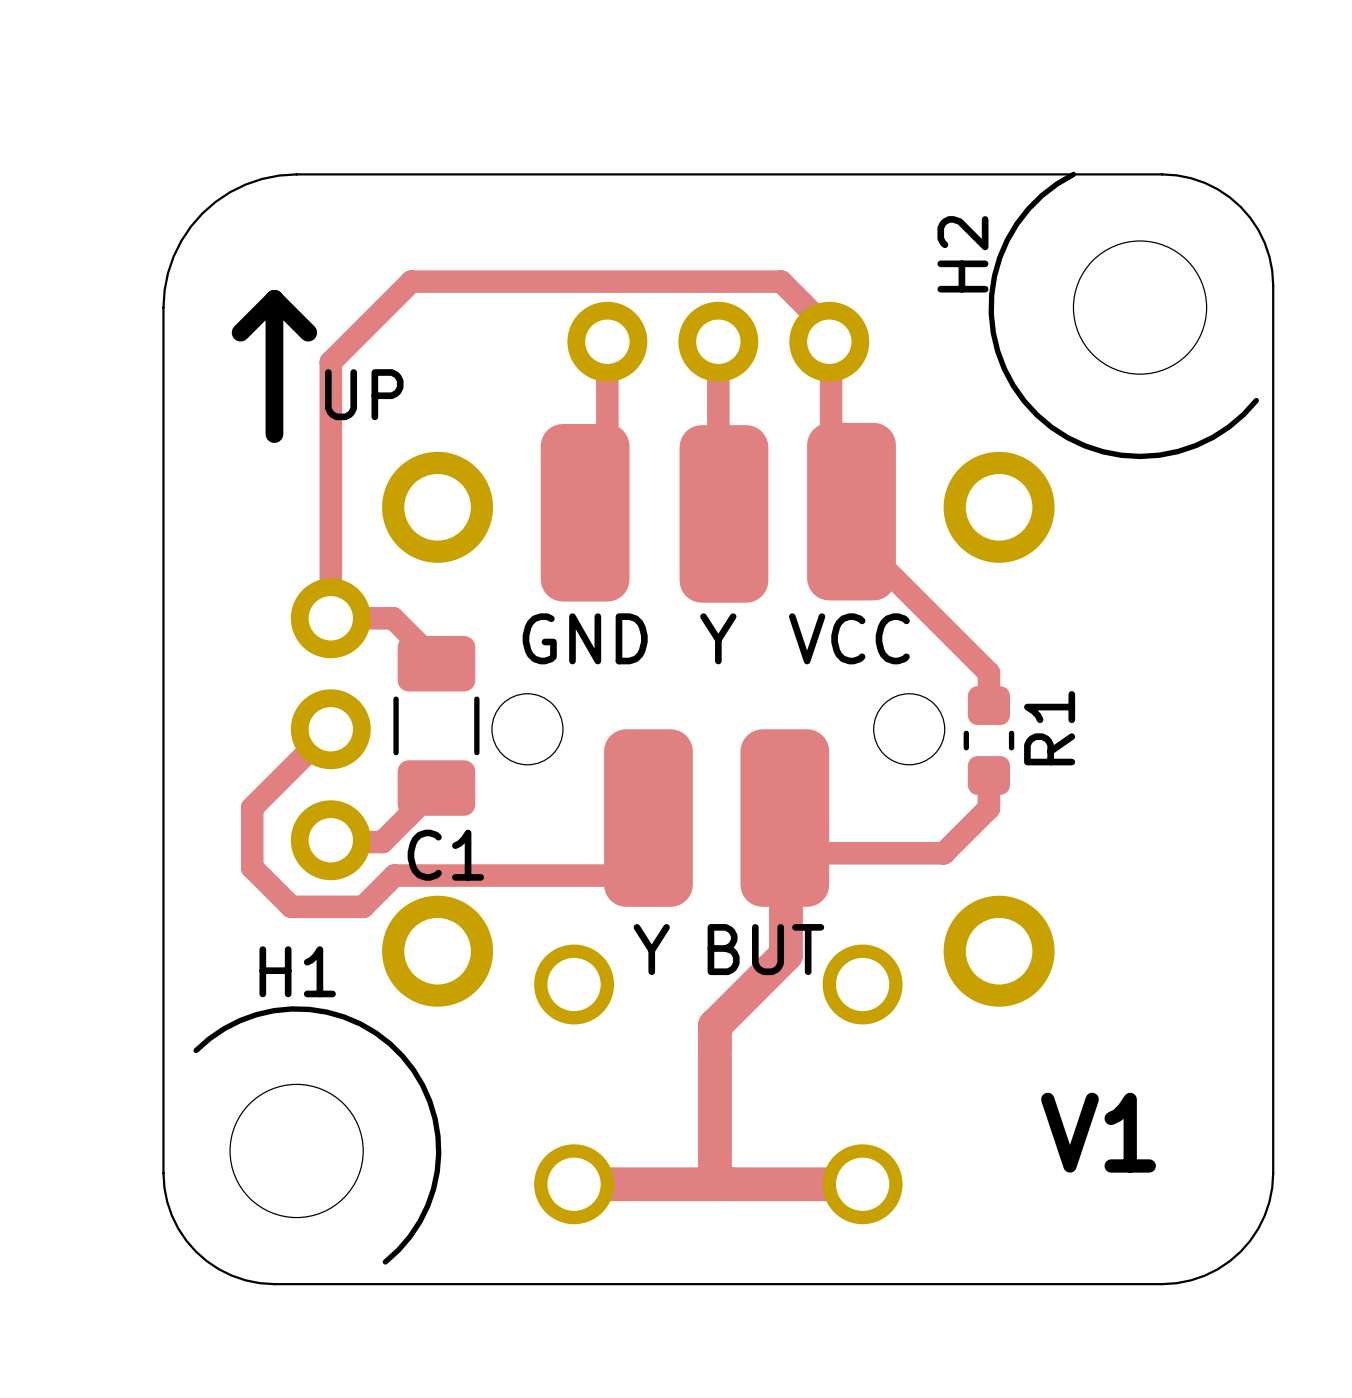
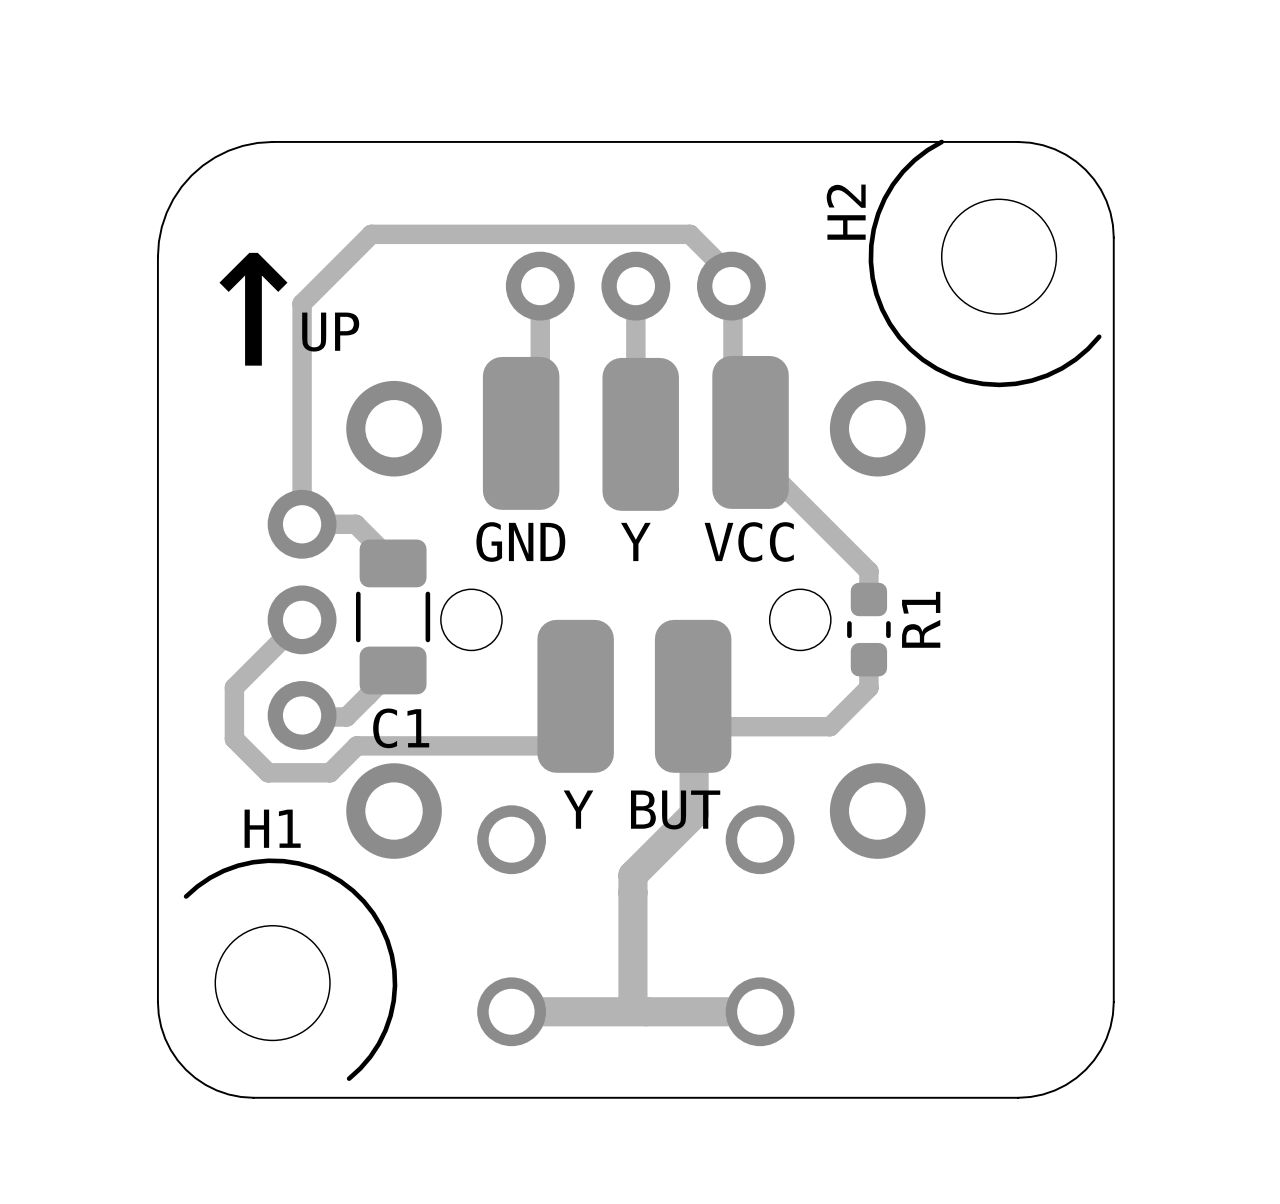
text: V1 (1098, 1132) -> none

